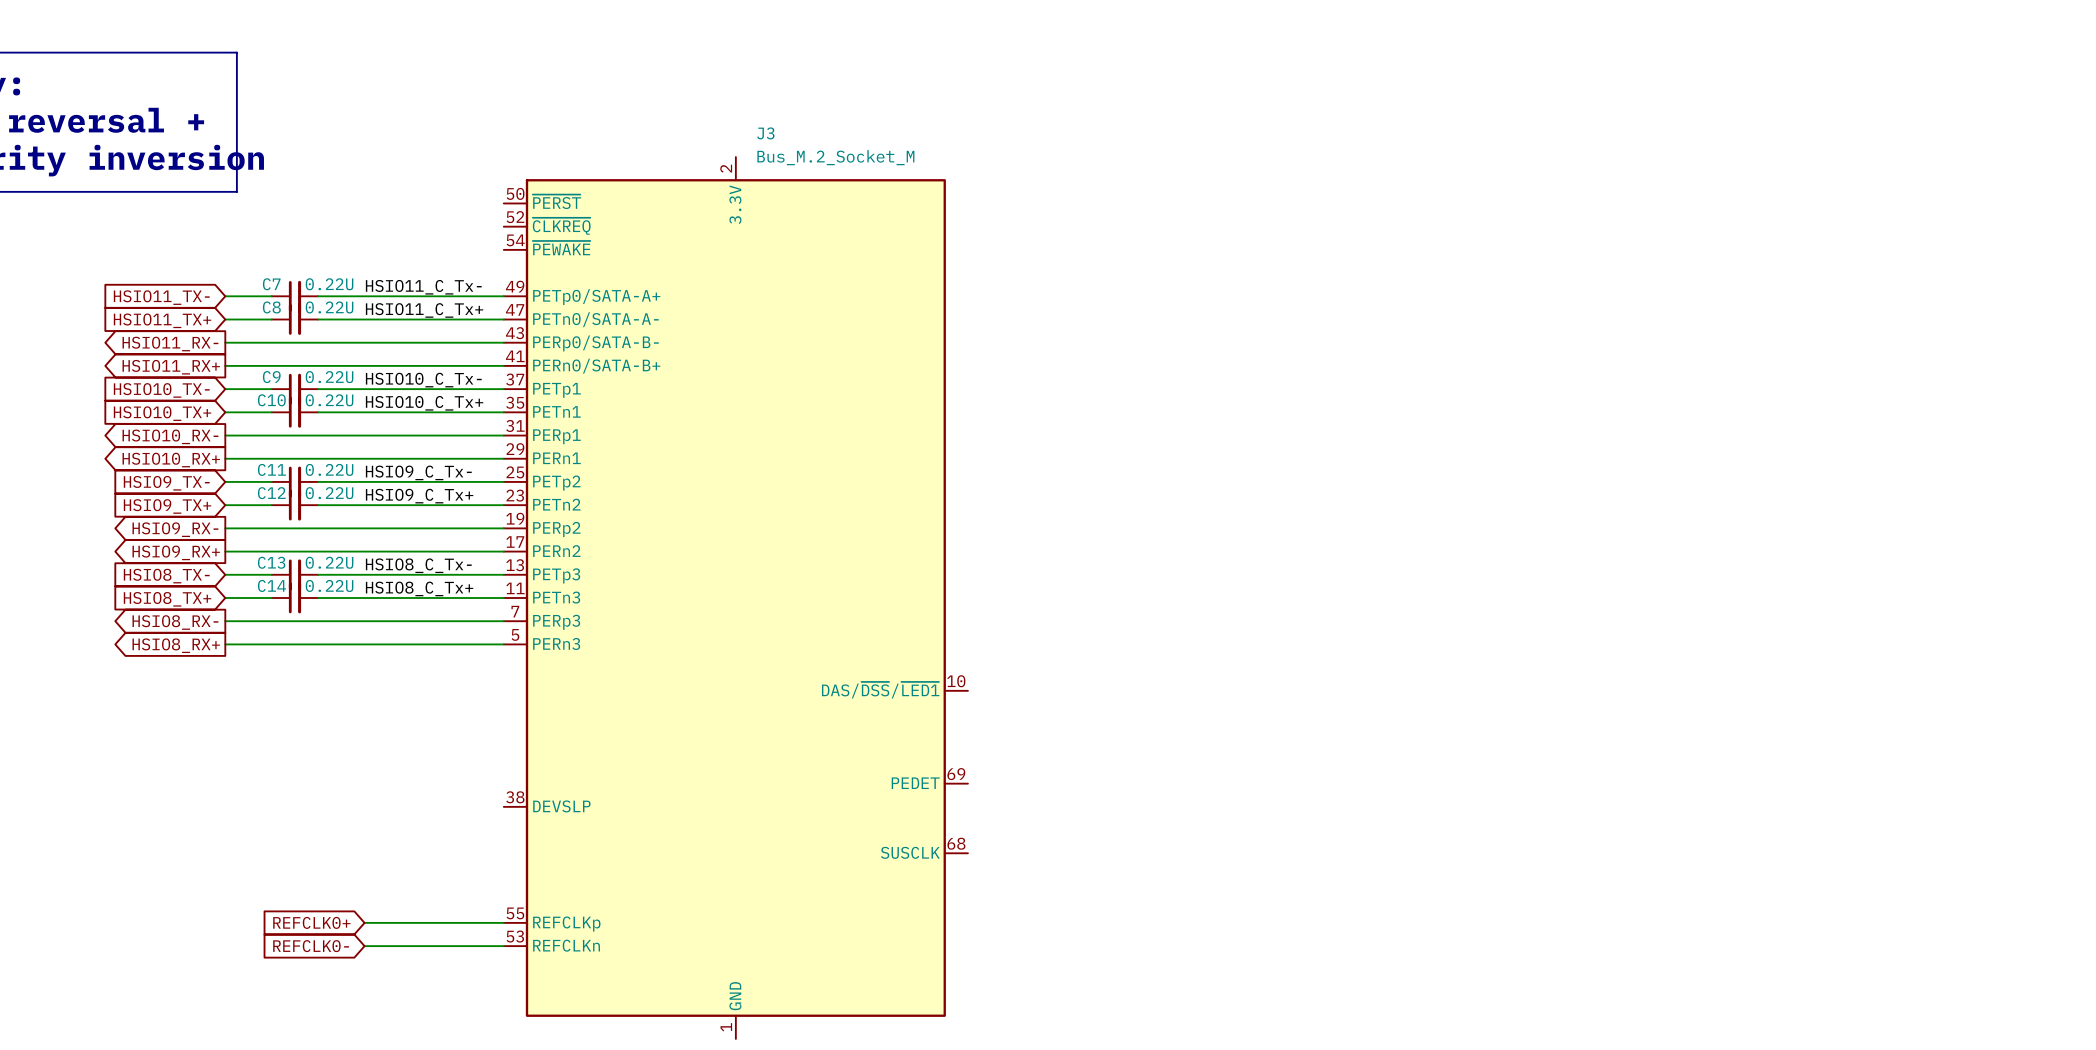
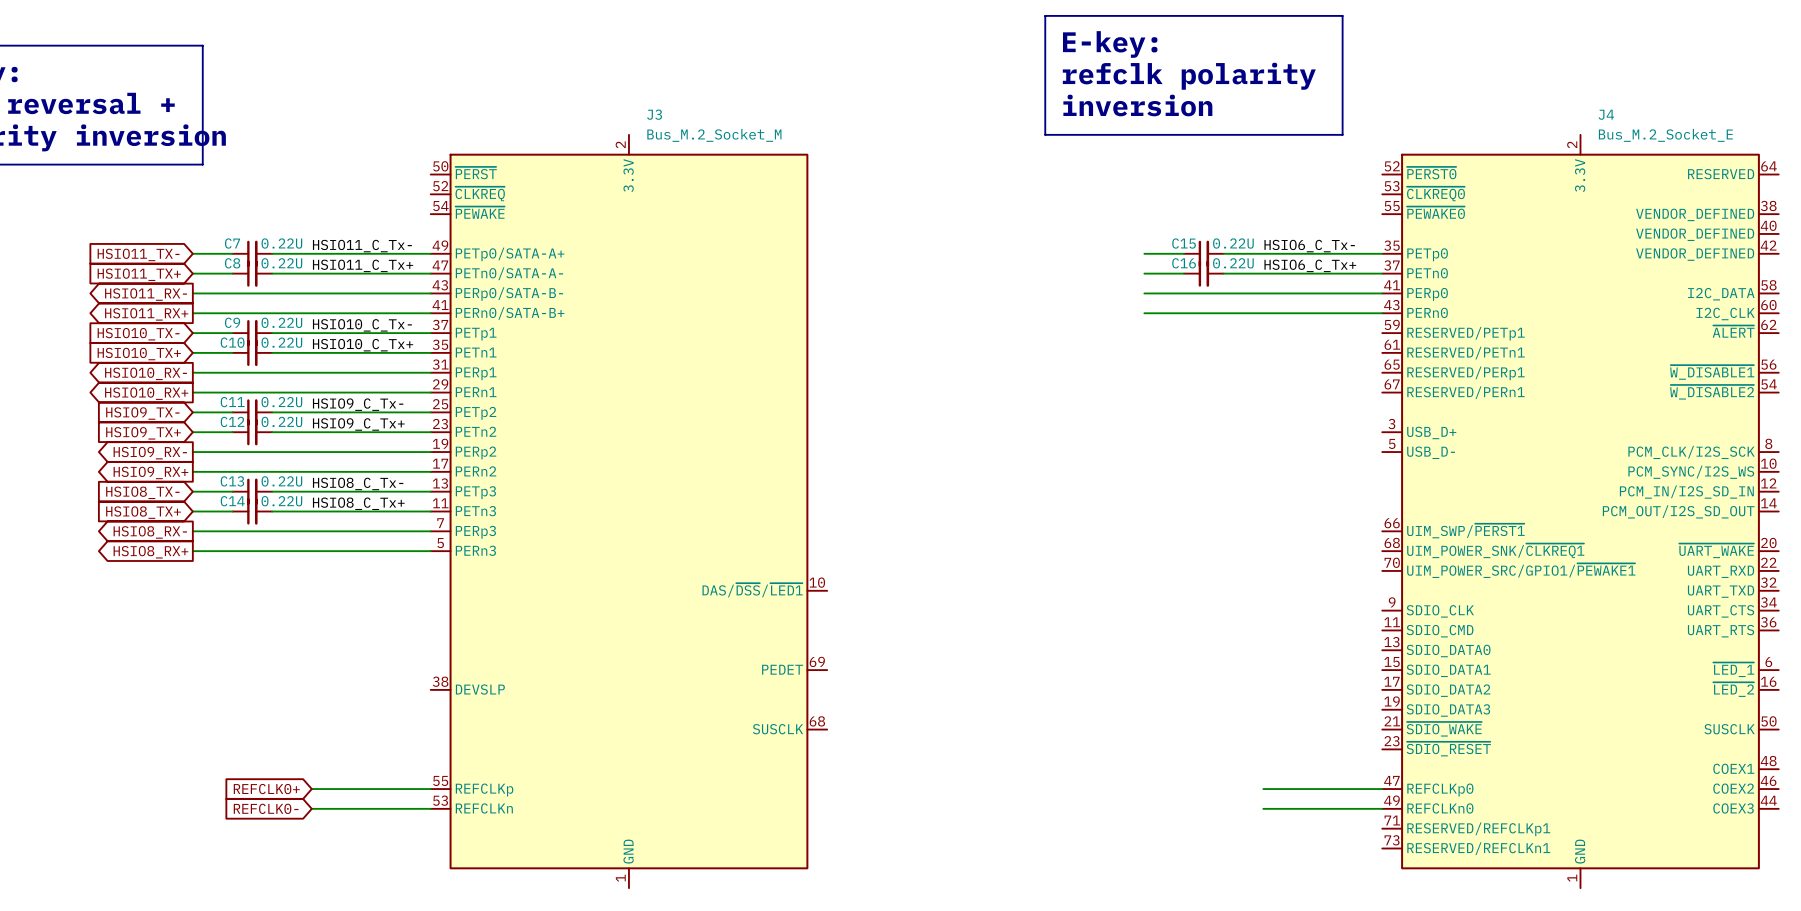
line: none -> (1045, 15) (1342, 15) (1342, 134) (1045, 134) (1045, 15)
text: none -> E-key: (1110, 44)
text: none -> refclk polarity (1189, 76)
text: none -> inversion (1137, 105)
label: none -> HSIO6_C_Tx- (1309, 246)
wire: none -> (1144, 253) (1184, 253)
C15: none -> 0.22U (1203, 253)
wire: none -> (1223, 253) (1382, 253)
label: none -> HSIO6_C_Tx+ (1310, 265)
wire: none -> (1144, 273) (1184, 273)
C16: none -> 0.22U (1203, 273)
wire: none -> (1223, 273) (1382, 273)
wire: none -> (1144, 293) (1382, 293)
wire: none -> (1144, 313) (1382, 313)
J4: none -> Bus_M.2_Socket_E (1580, 511)
wire: none -> (1263, 789) (1382, 789)
wire: none -> (1263, 808) (1382, 808)

